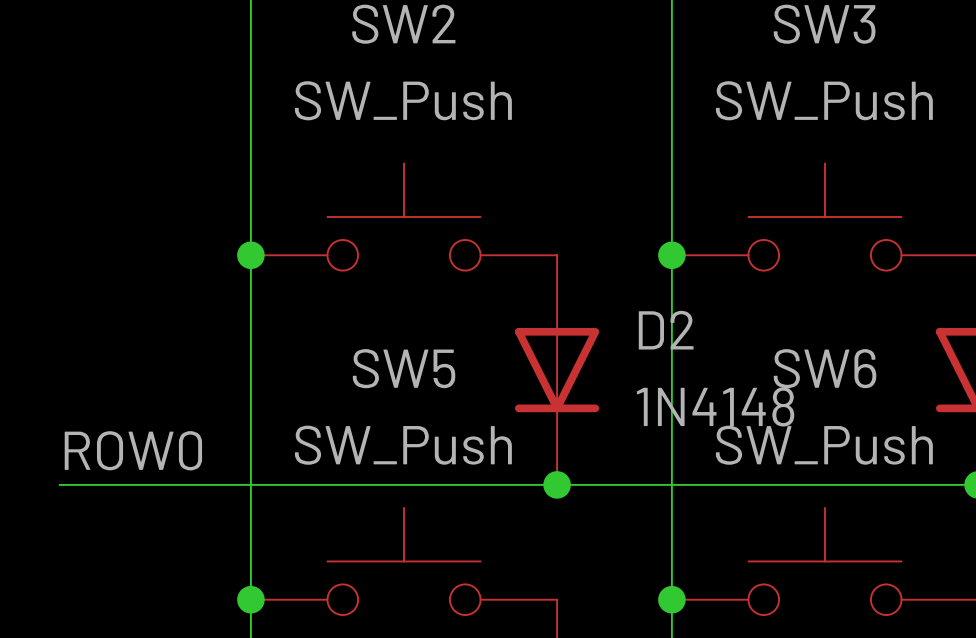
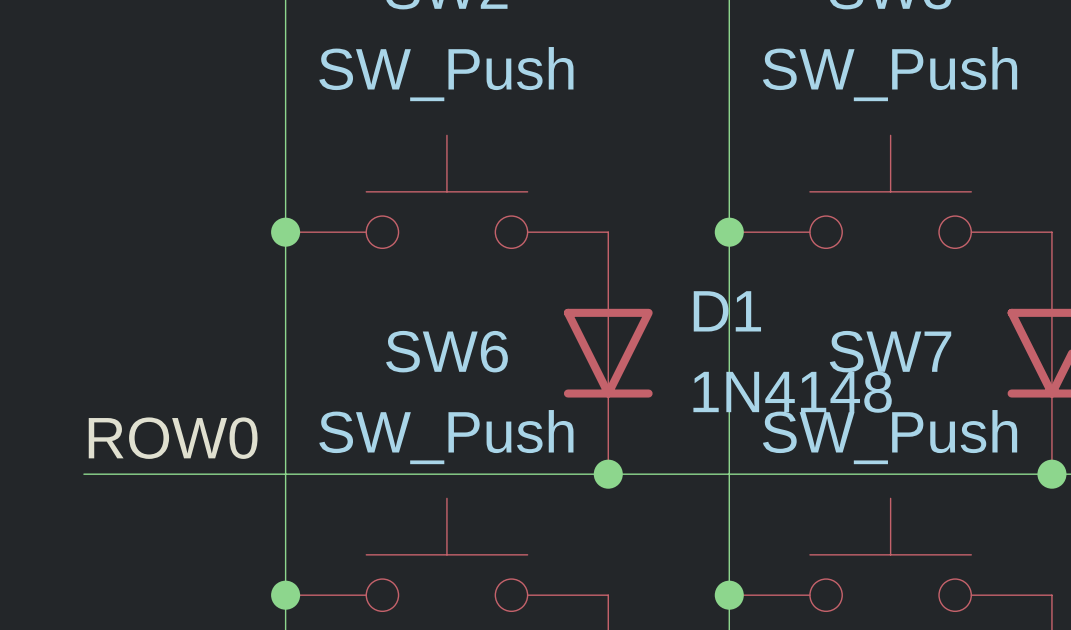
D2 name: D2 (666, 330) -> D1 (727, 311)
SW5 name: SW5 (404, 368) -> SW6 (446, 351)
SW6 name: SW6 (825, 368) -> SW7 (890, 351)

